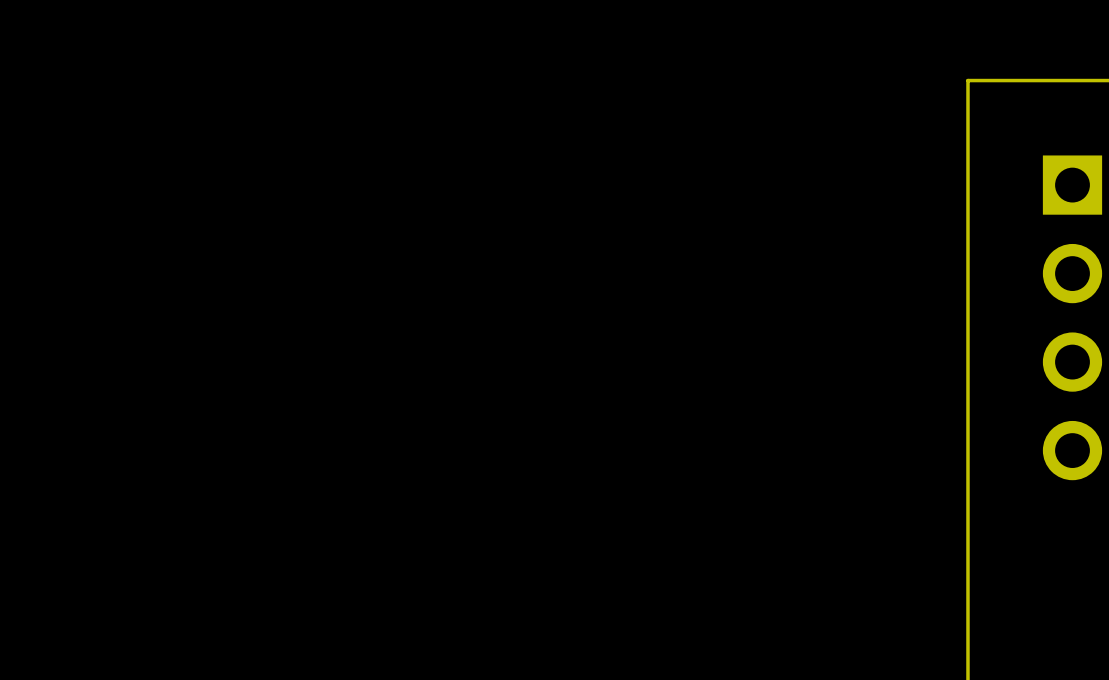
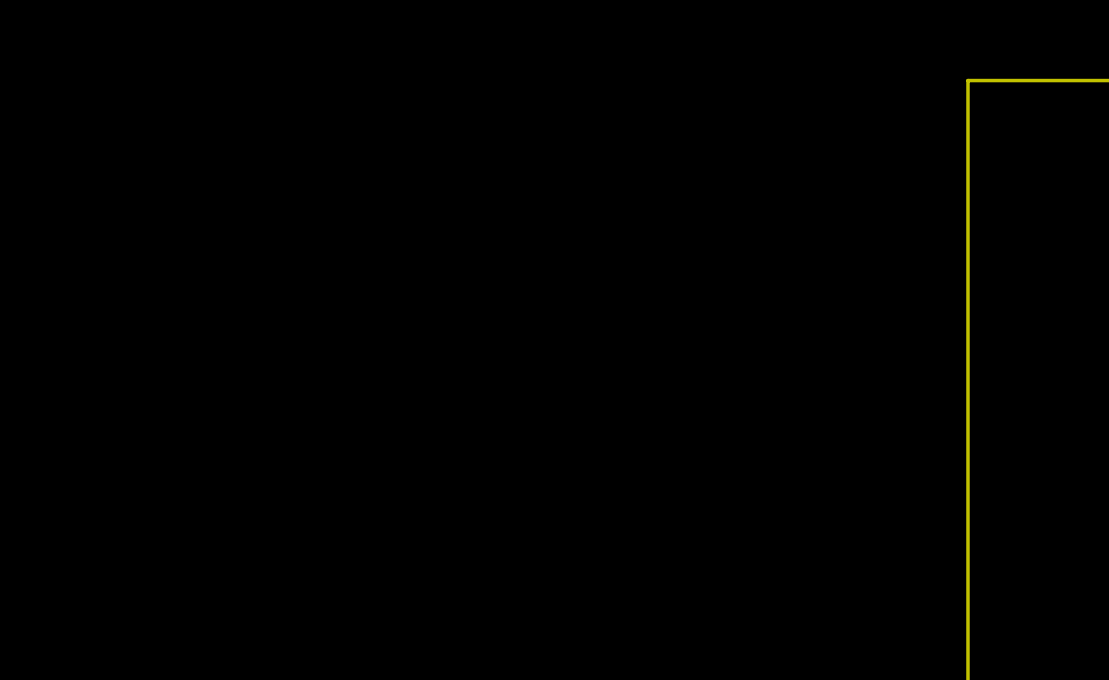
part: (1072, 317) -> none

